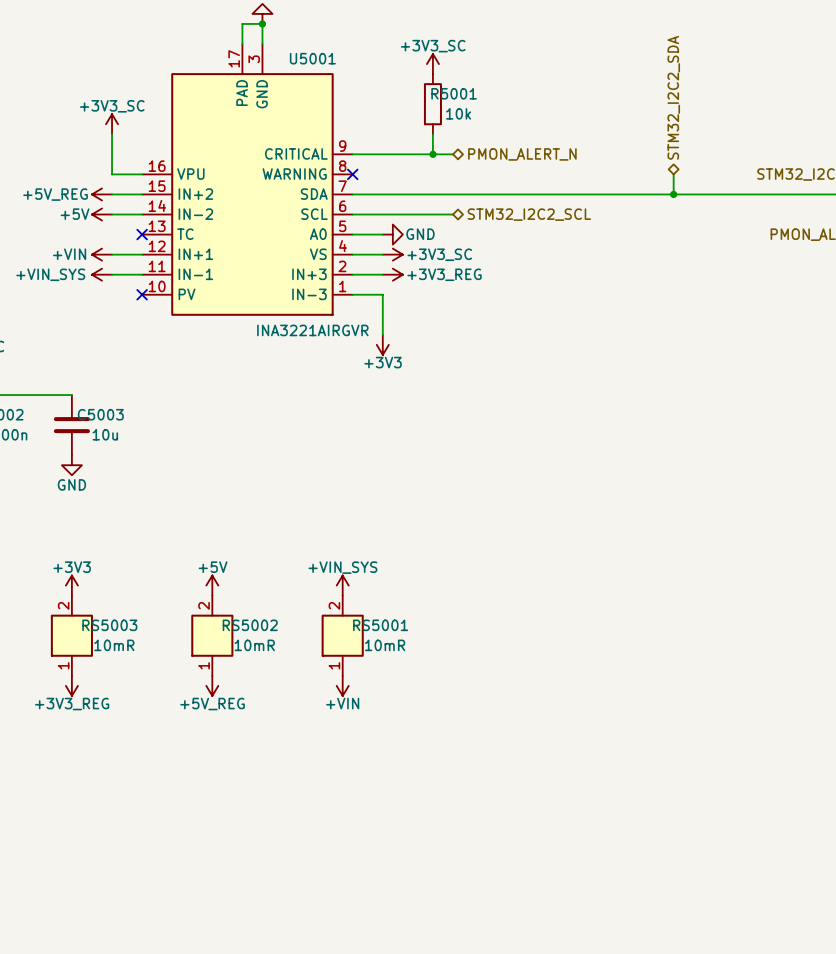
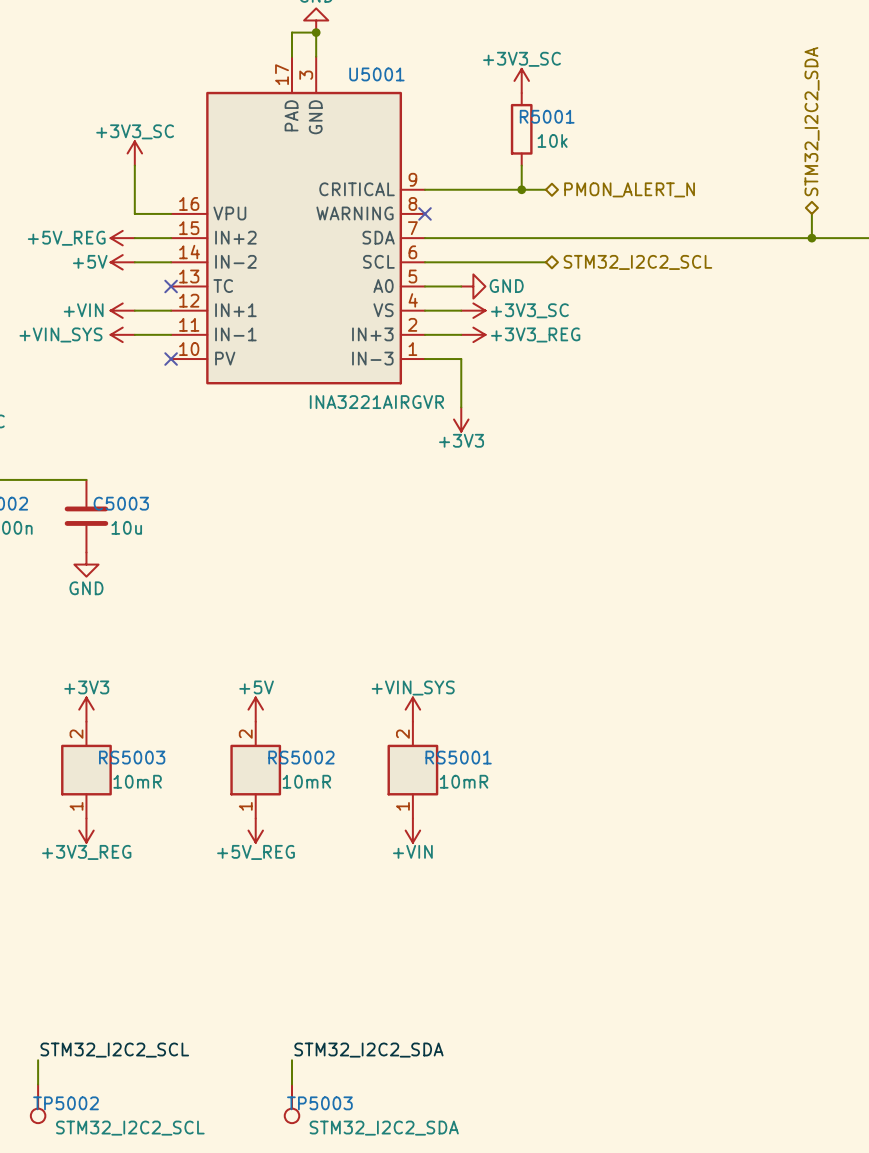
label: none -> STM32_I2C2_SCL (114, 1050)
label: none -> STM32_I2C2_SDA (368, 1050)
wire: none -> (38, 1060) (38, 1084)
wire: none -> (292, 1060) (292, 1084)
TP5002: none -> STM32_I2C2_SCL (38, 1103)
TP5003: none -> STM32_I2C2_SDA (292, 1103)

